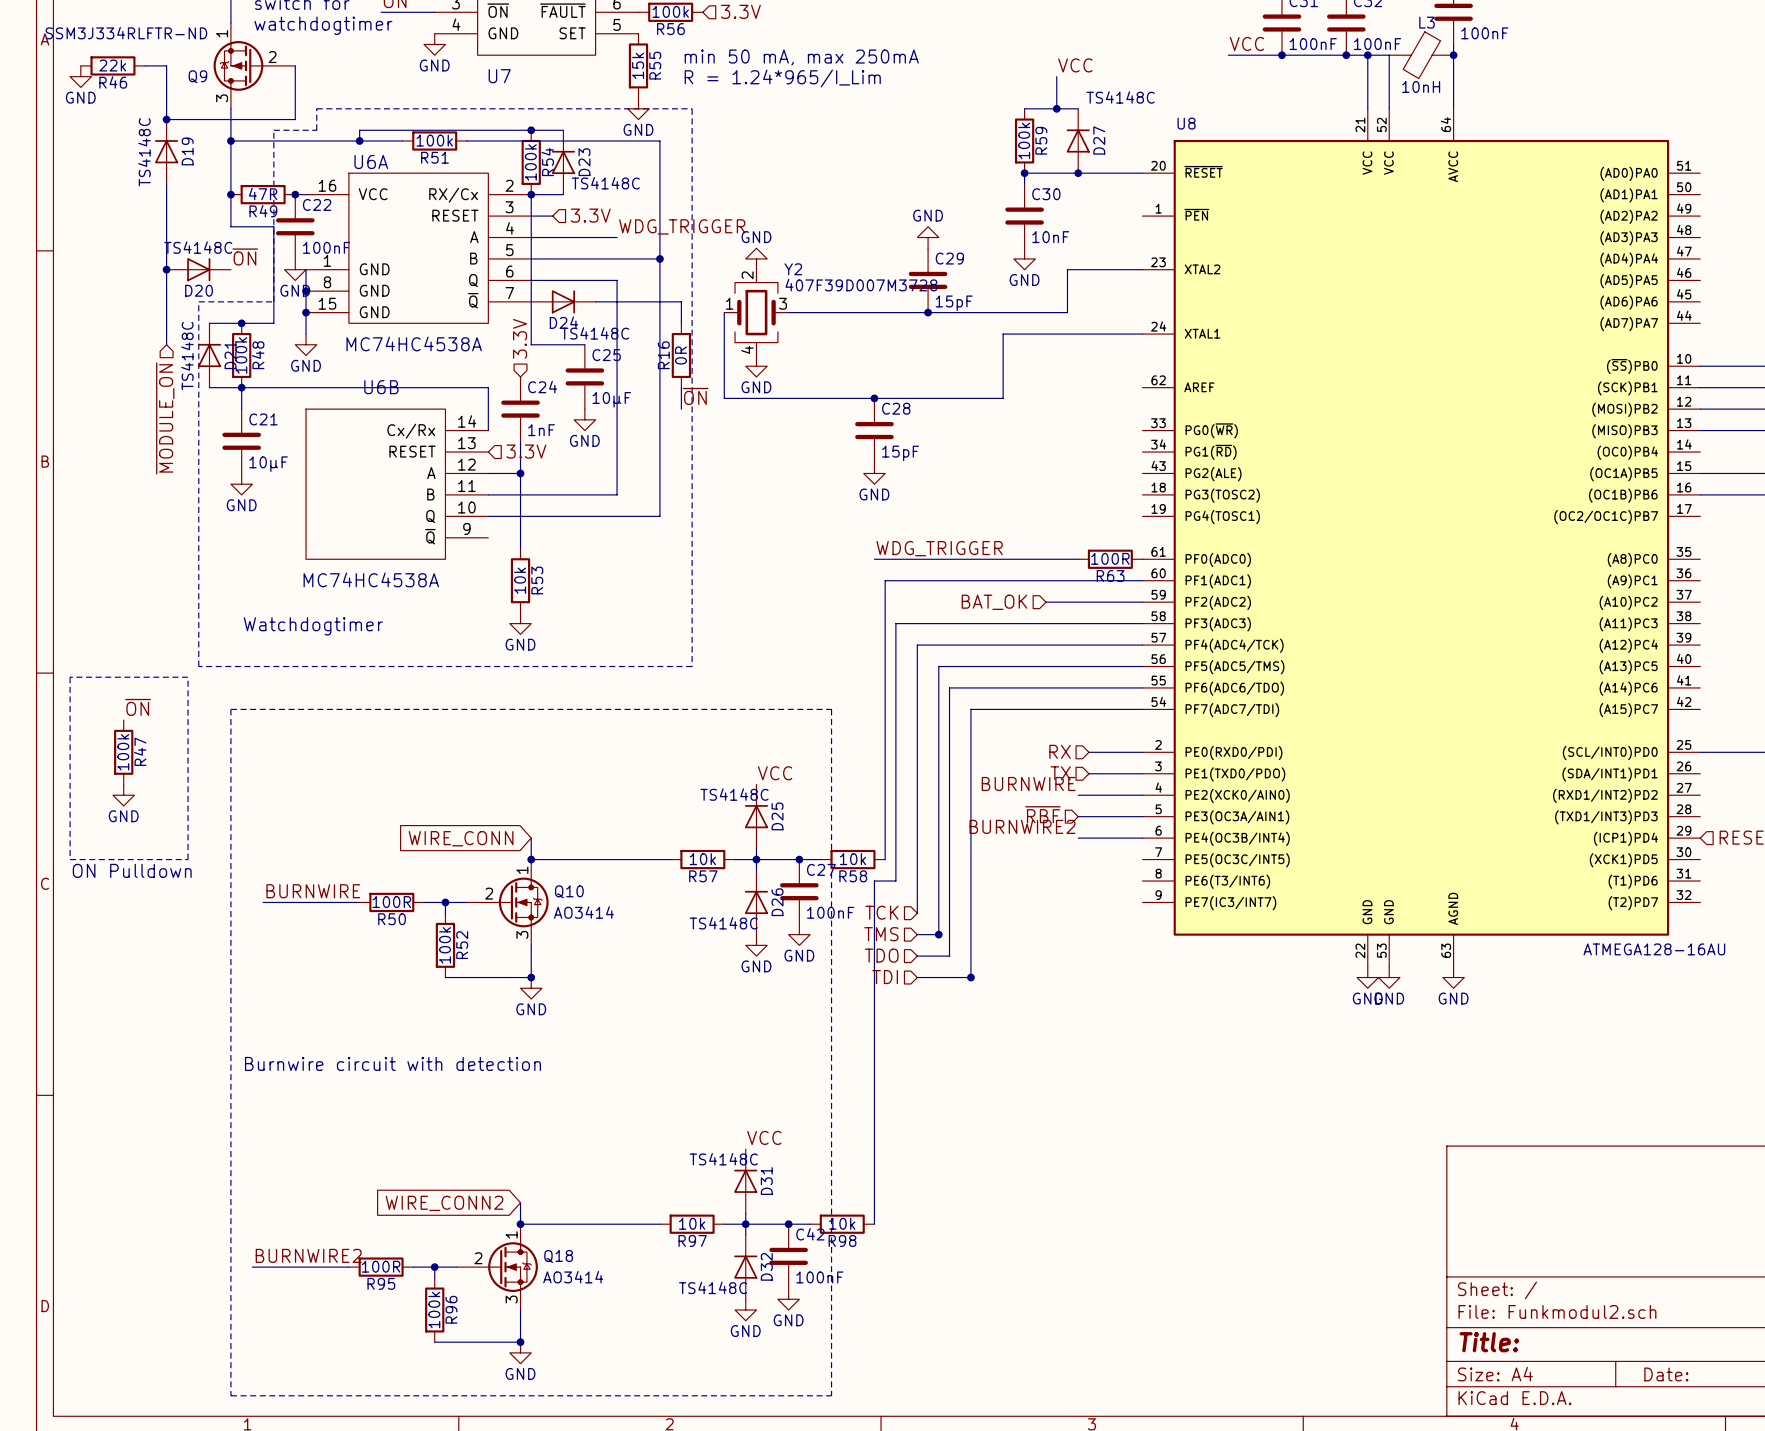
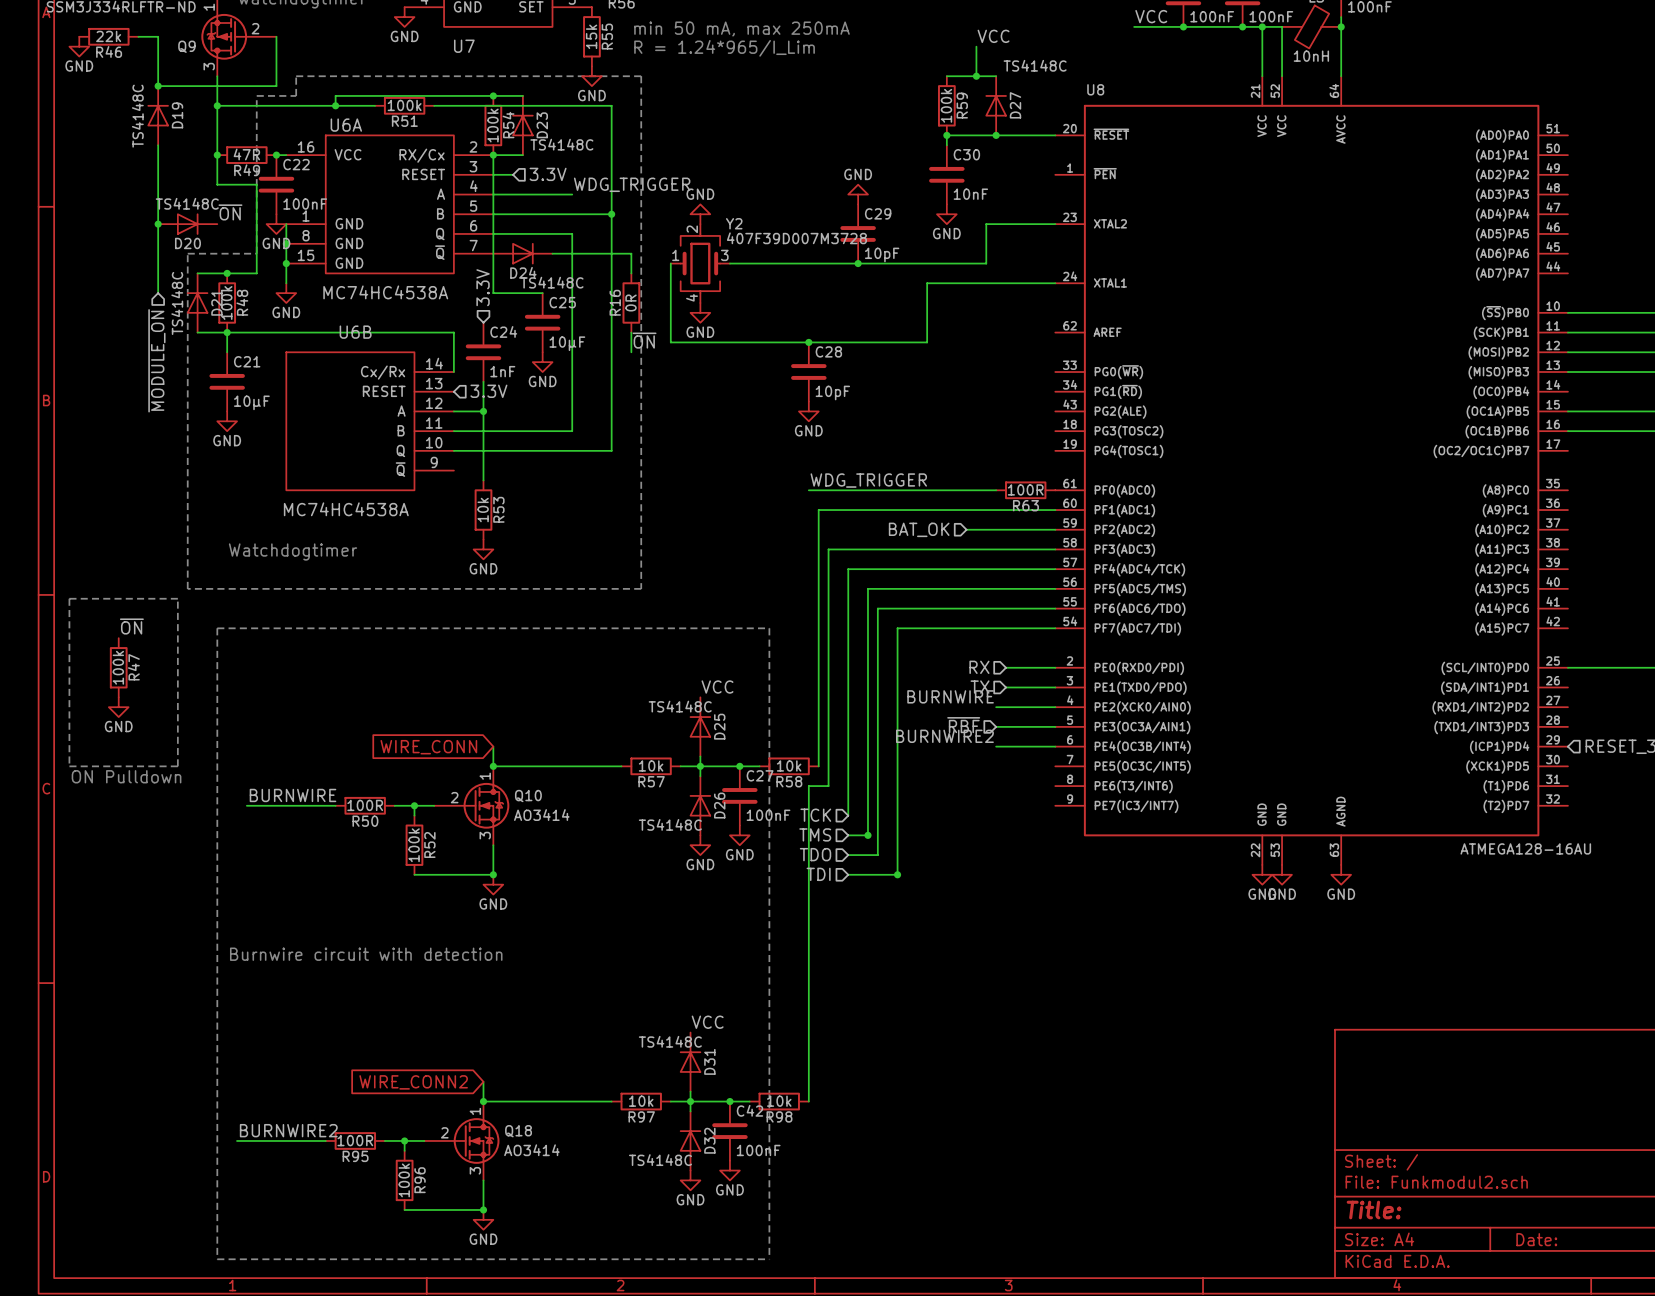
C29 value: 15pF (954, 303) -> 10pF (882, 254)
C28 value: 15pF (900, 453) -> 10pF (832, 392)

